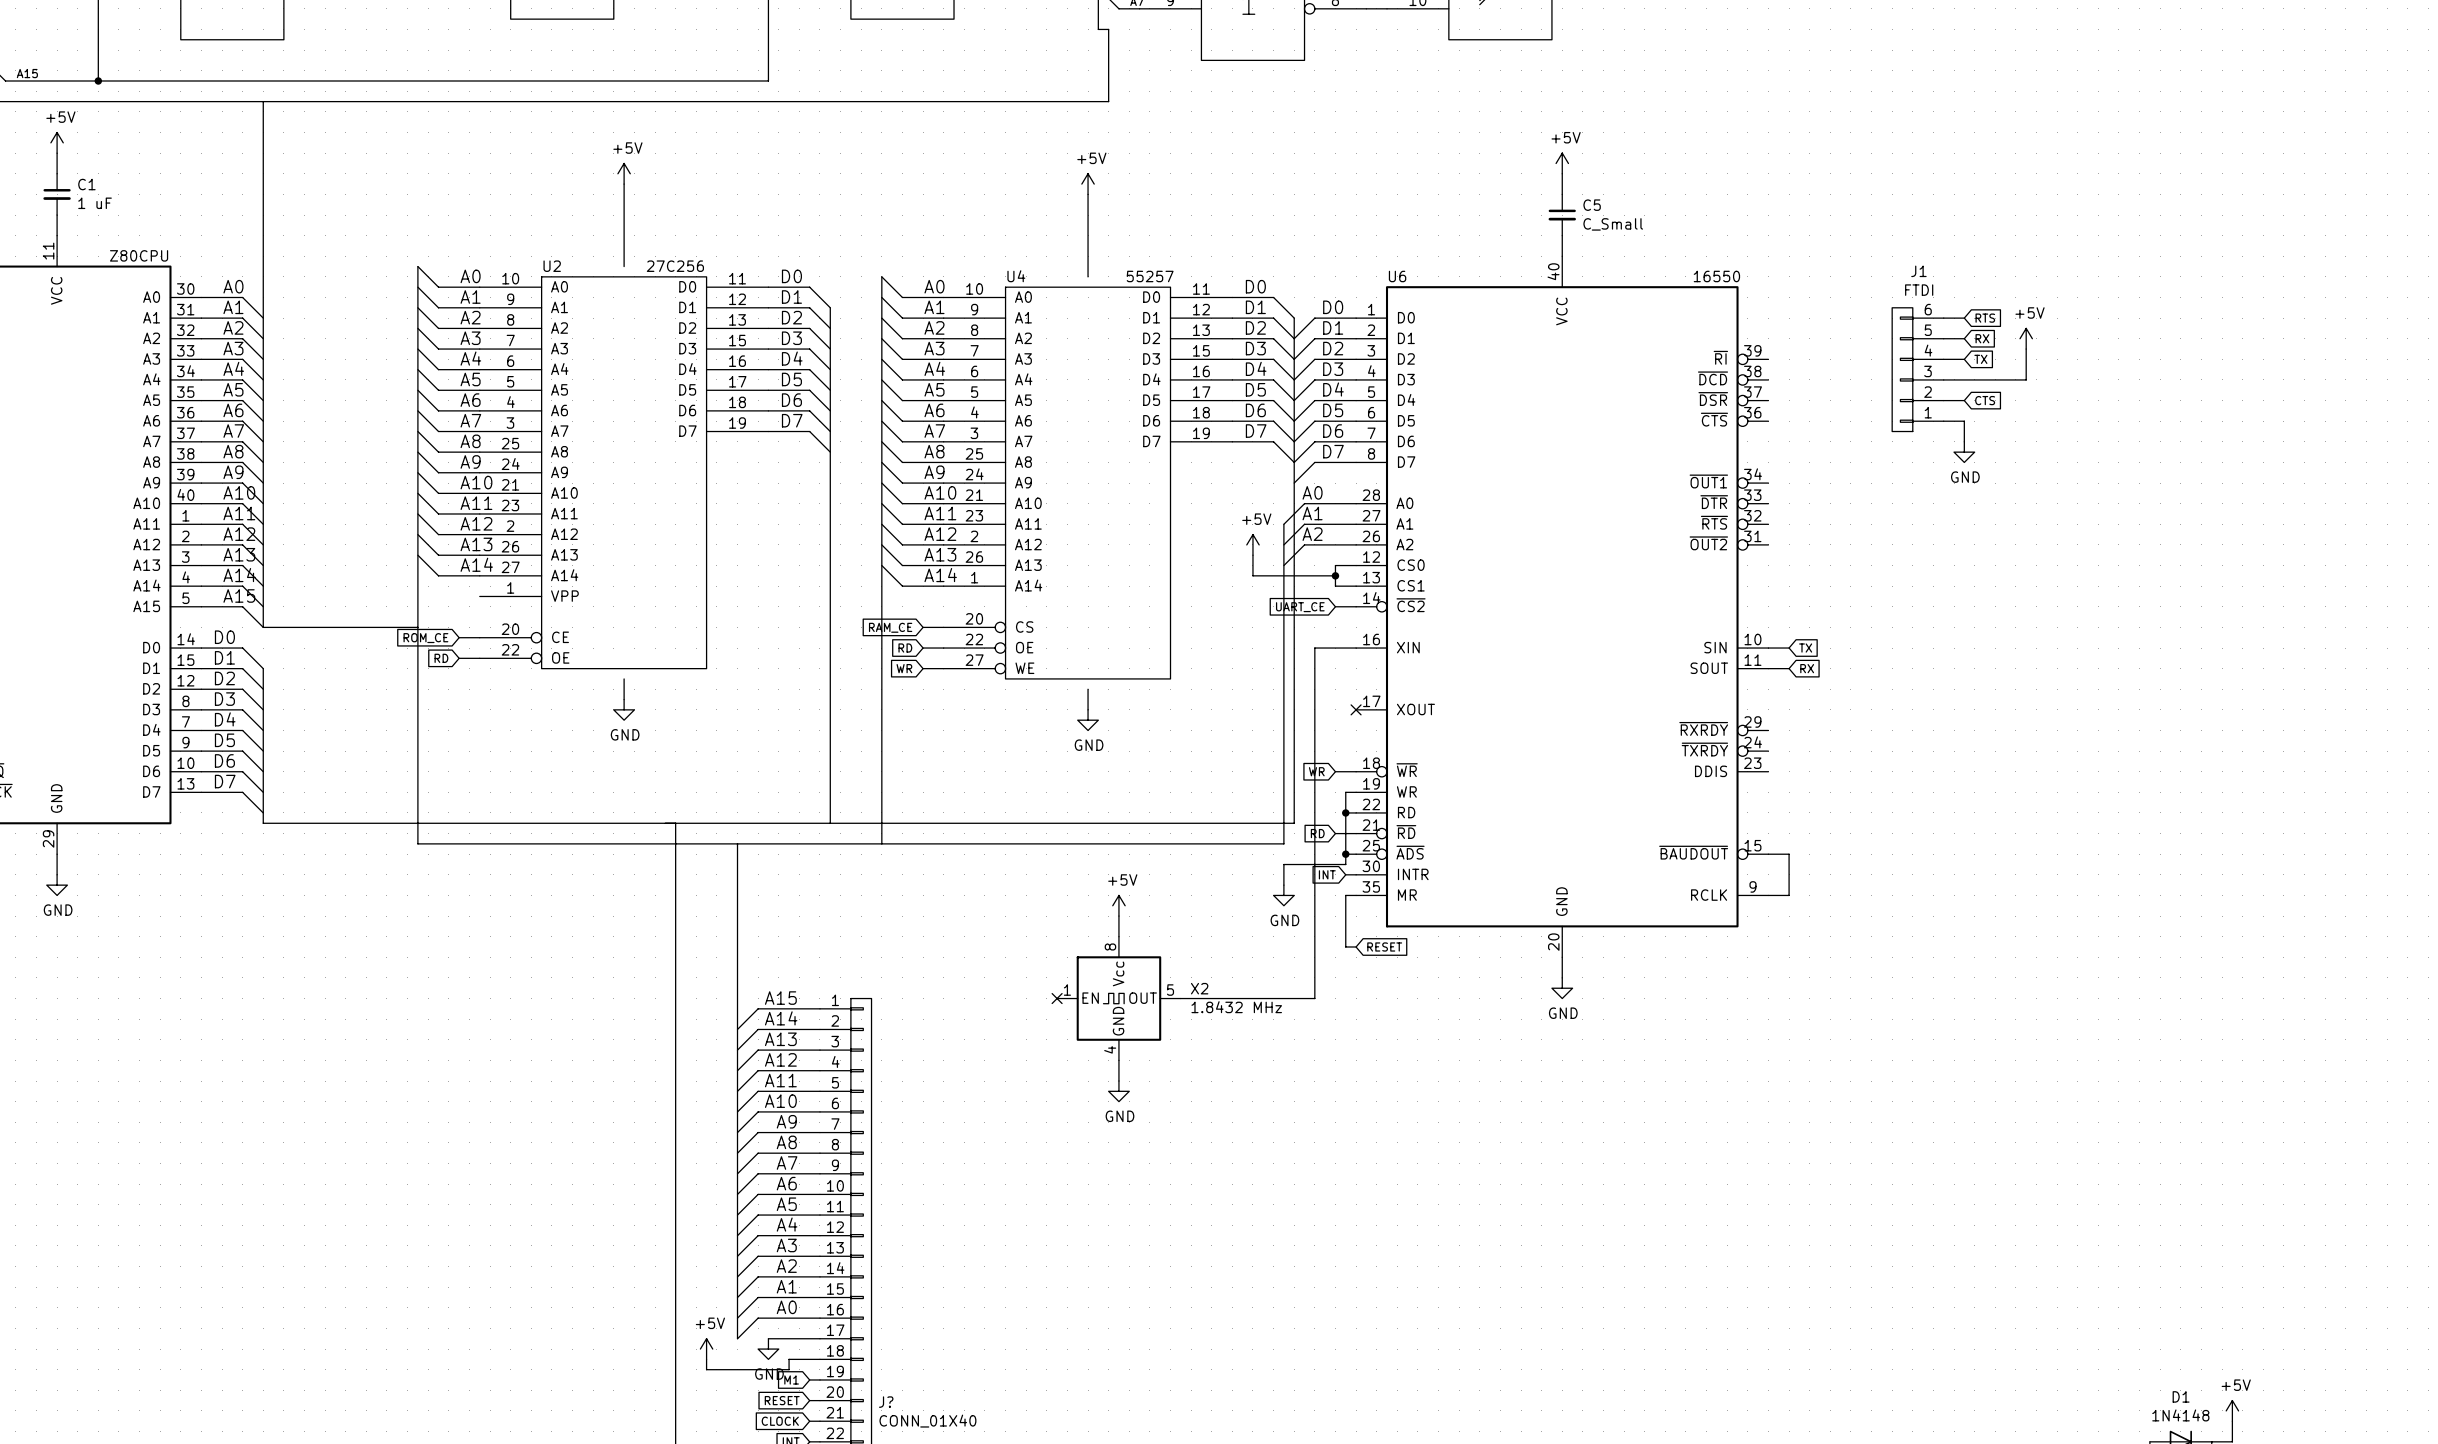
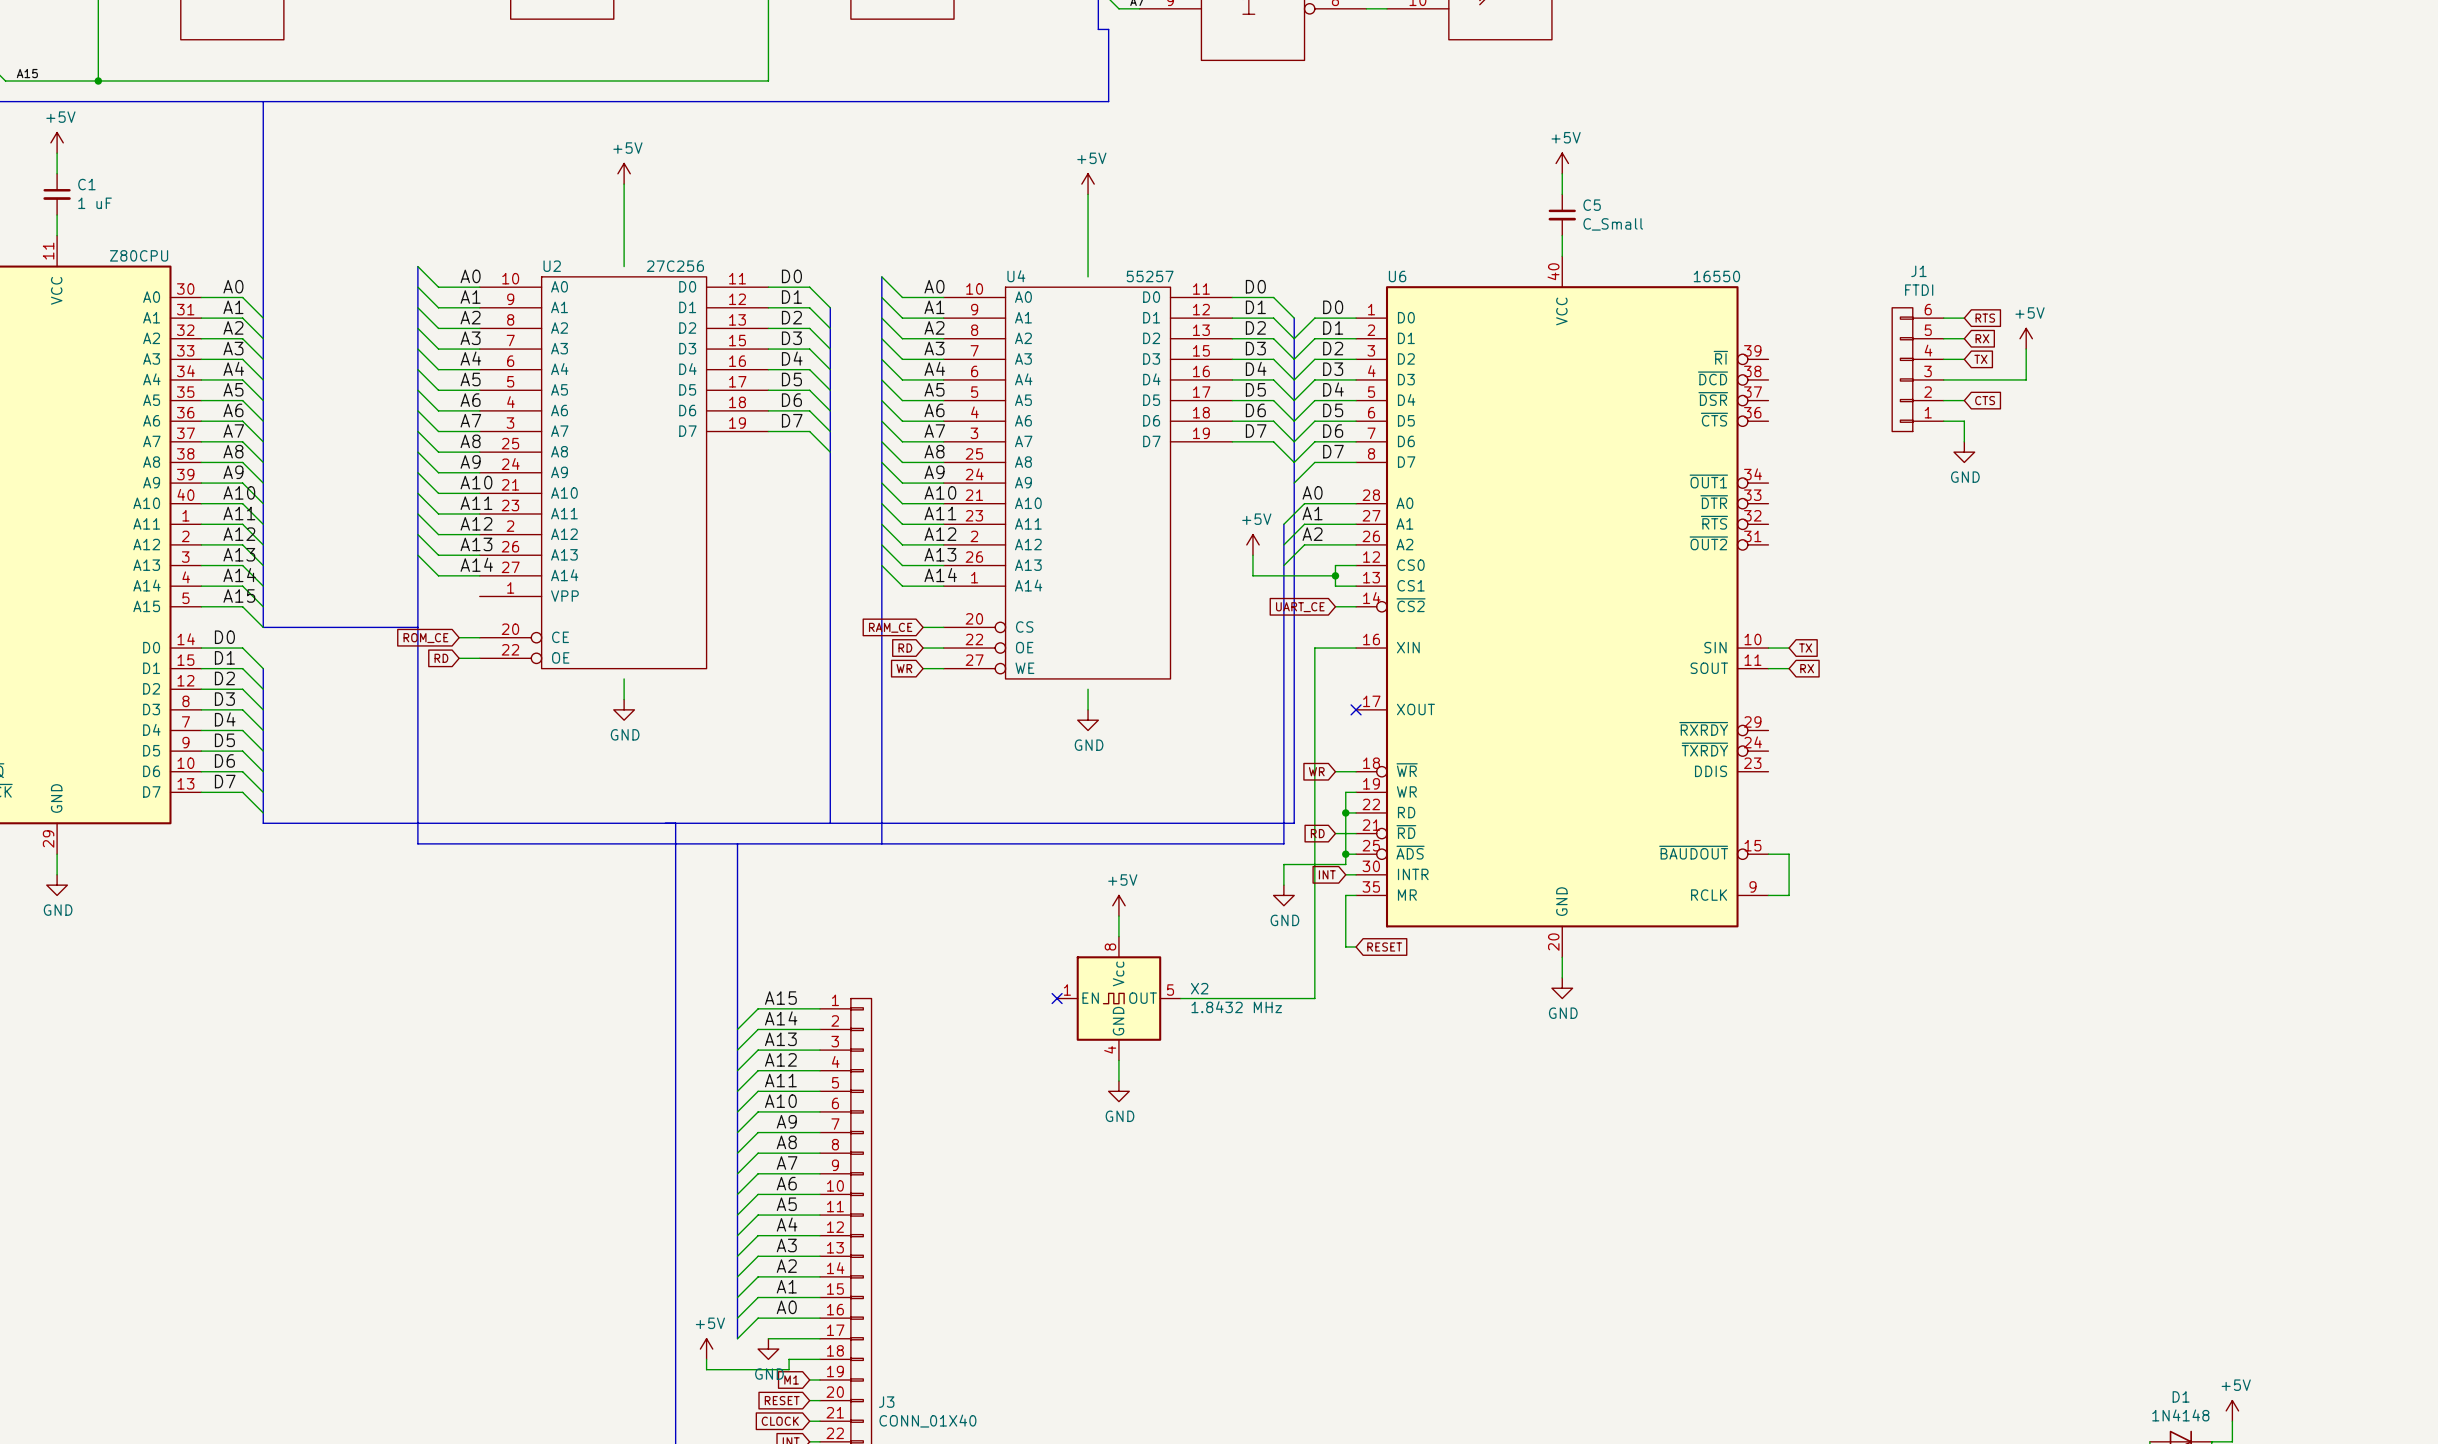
J? name: J? (886, 1402) -> J3 (886, 1402)

